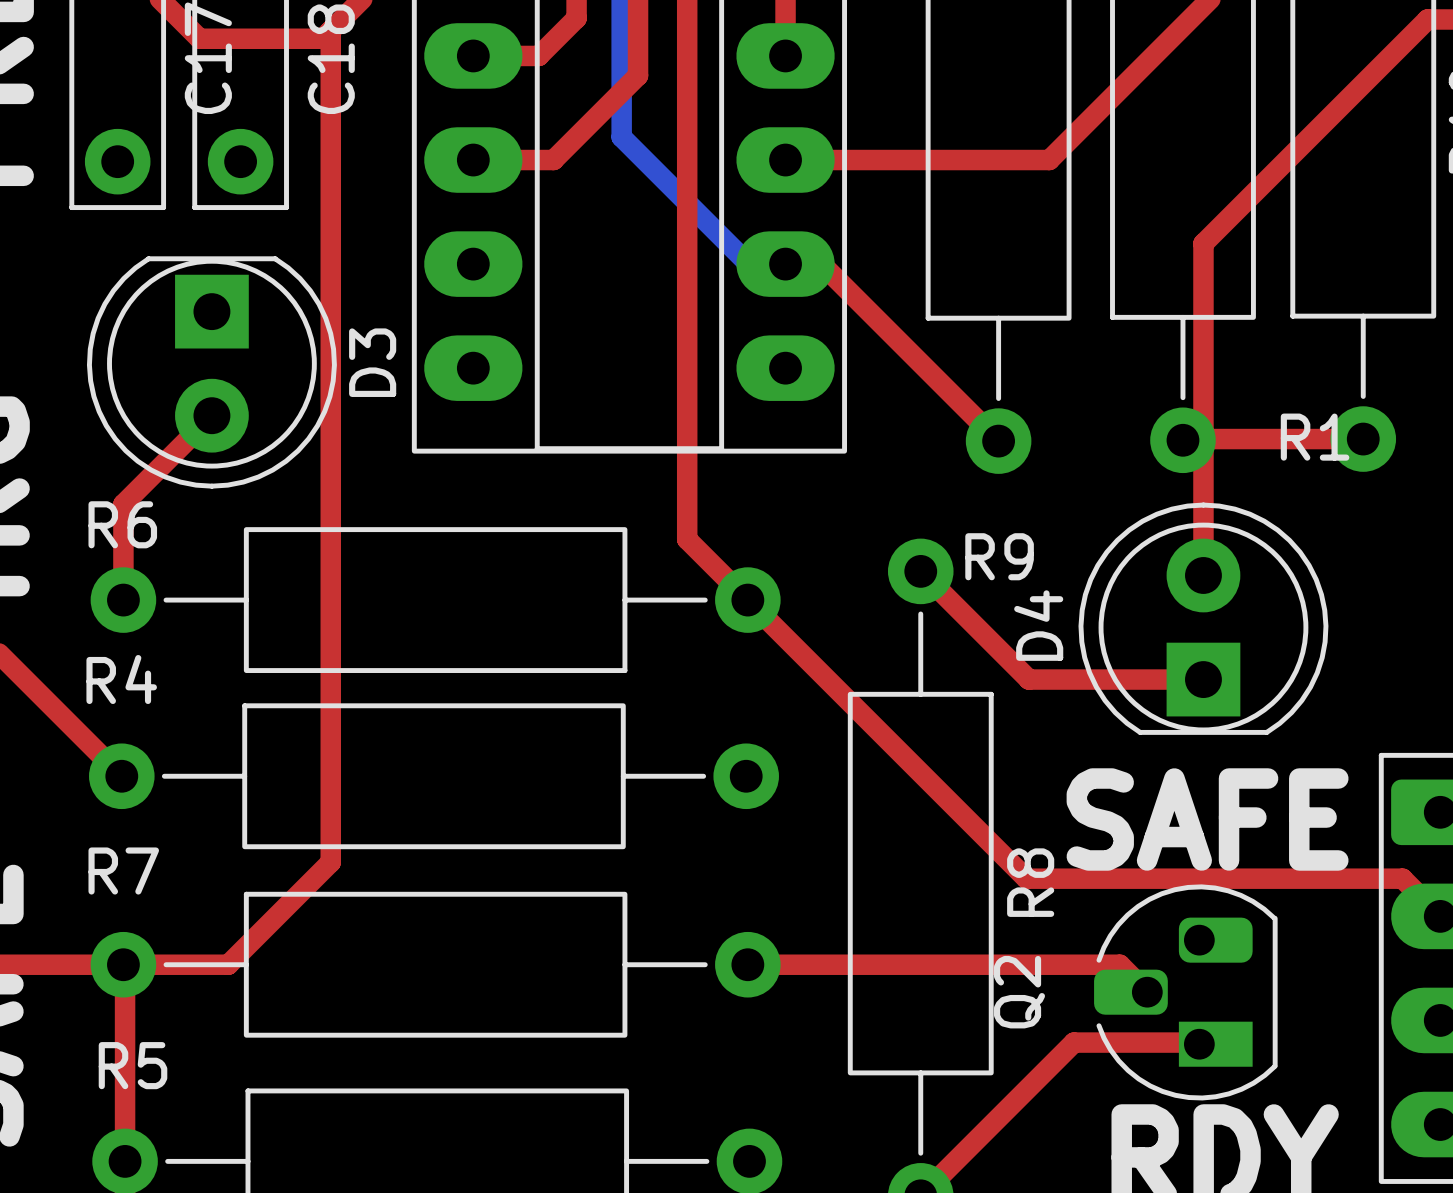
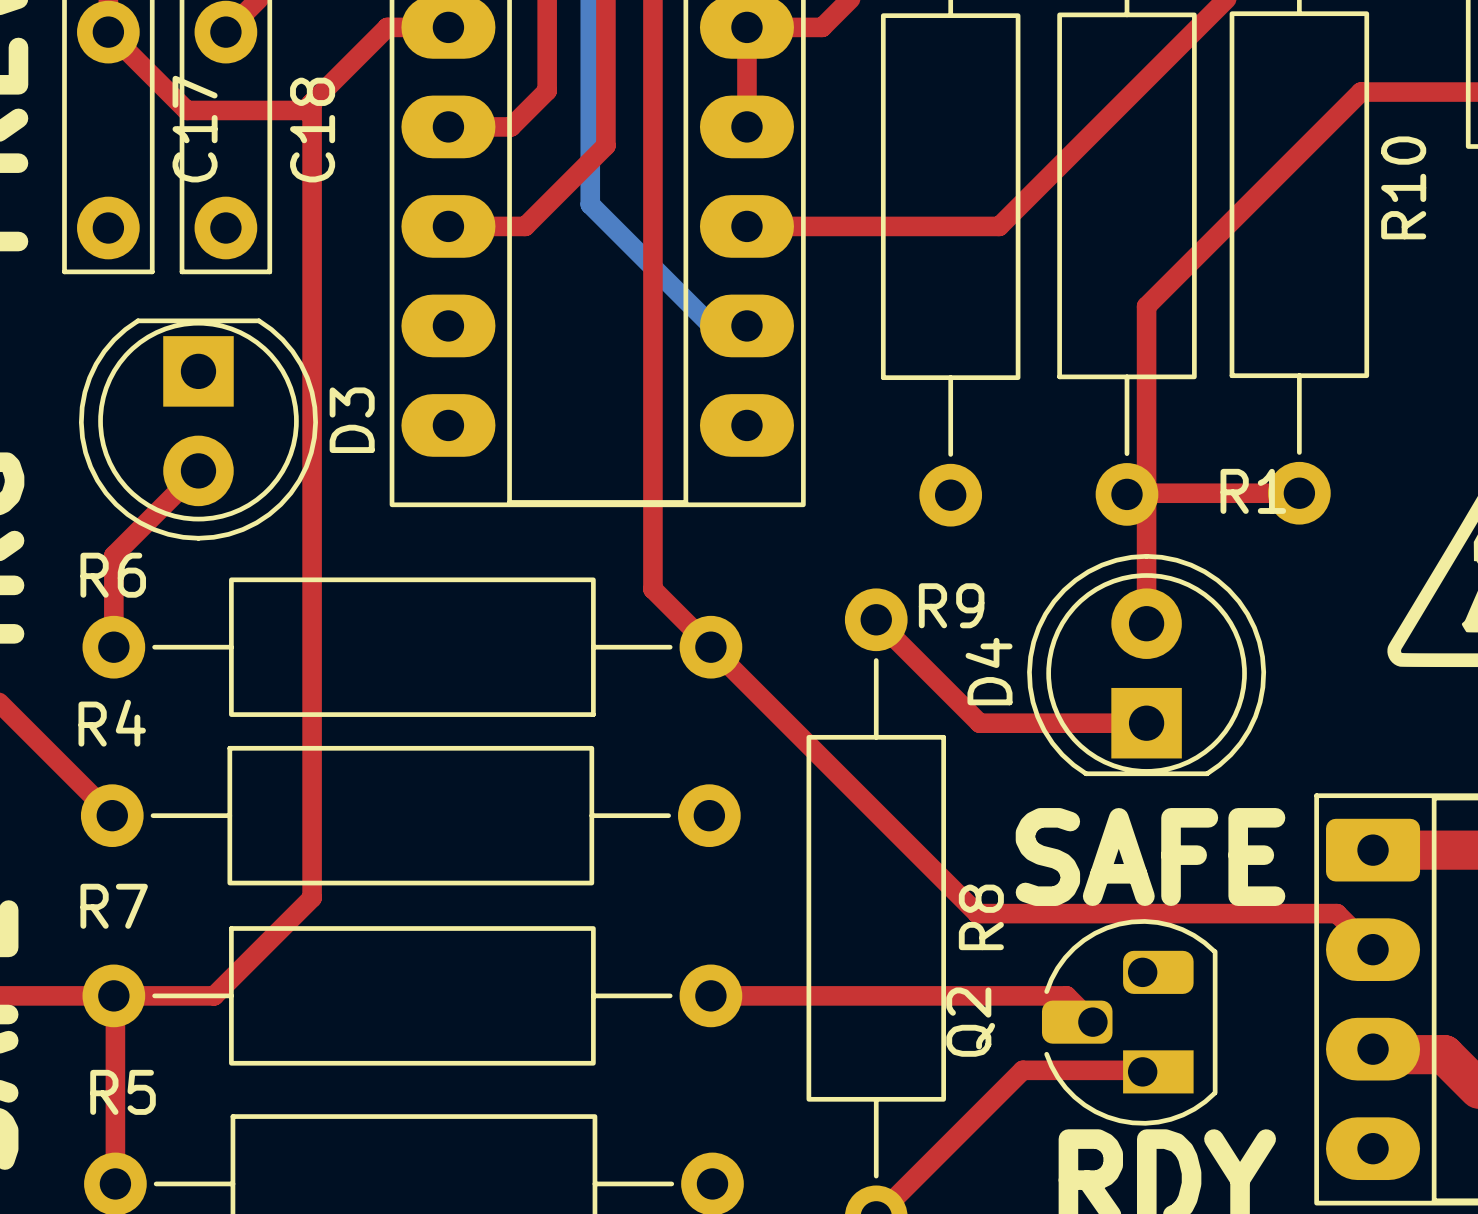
top track: (785, 264) (821, 264) (998, 441) -> none

